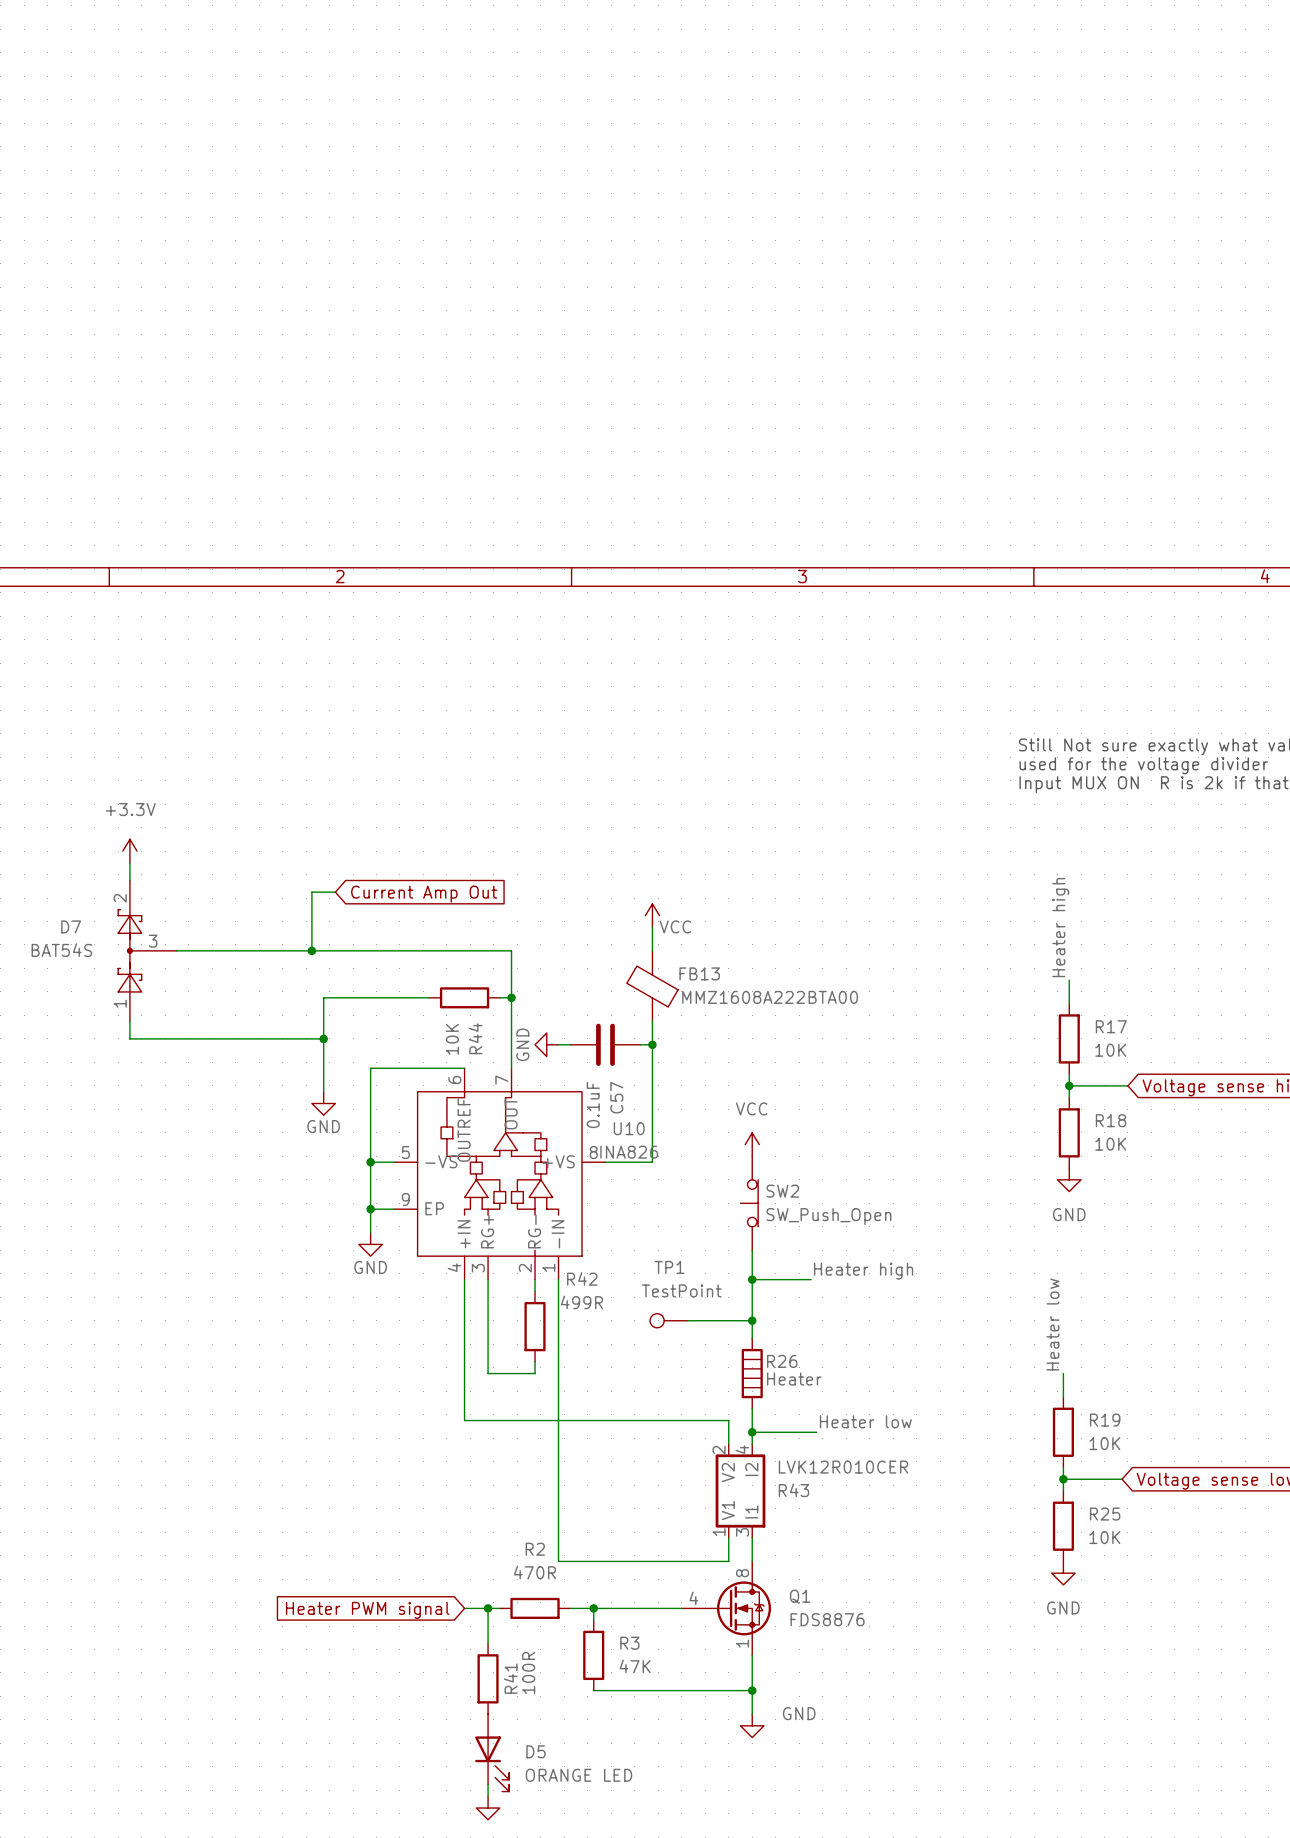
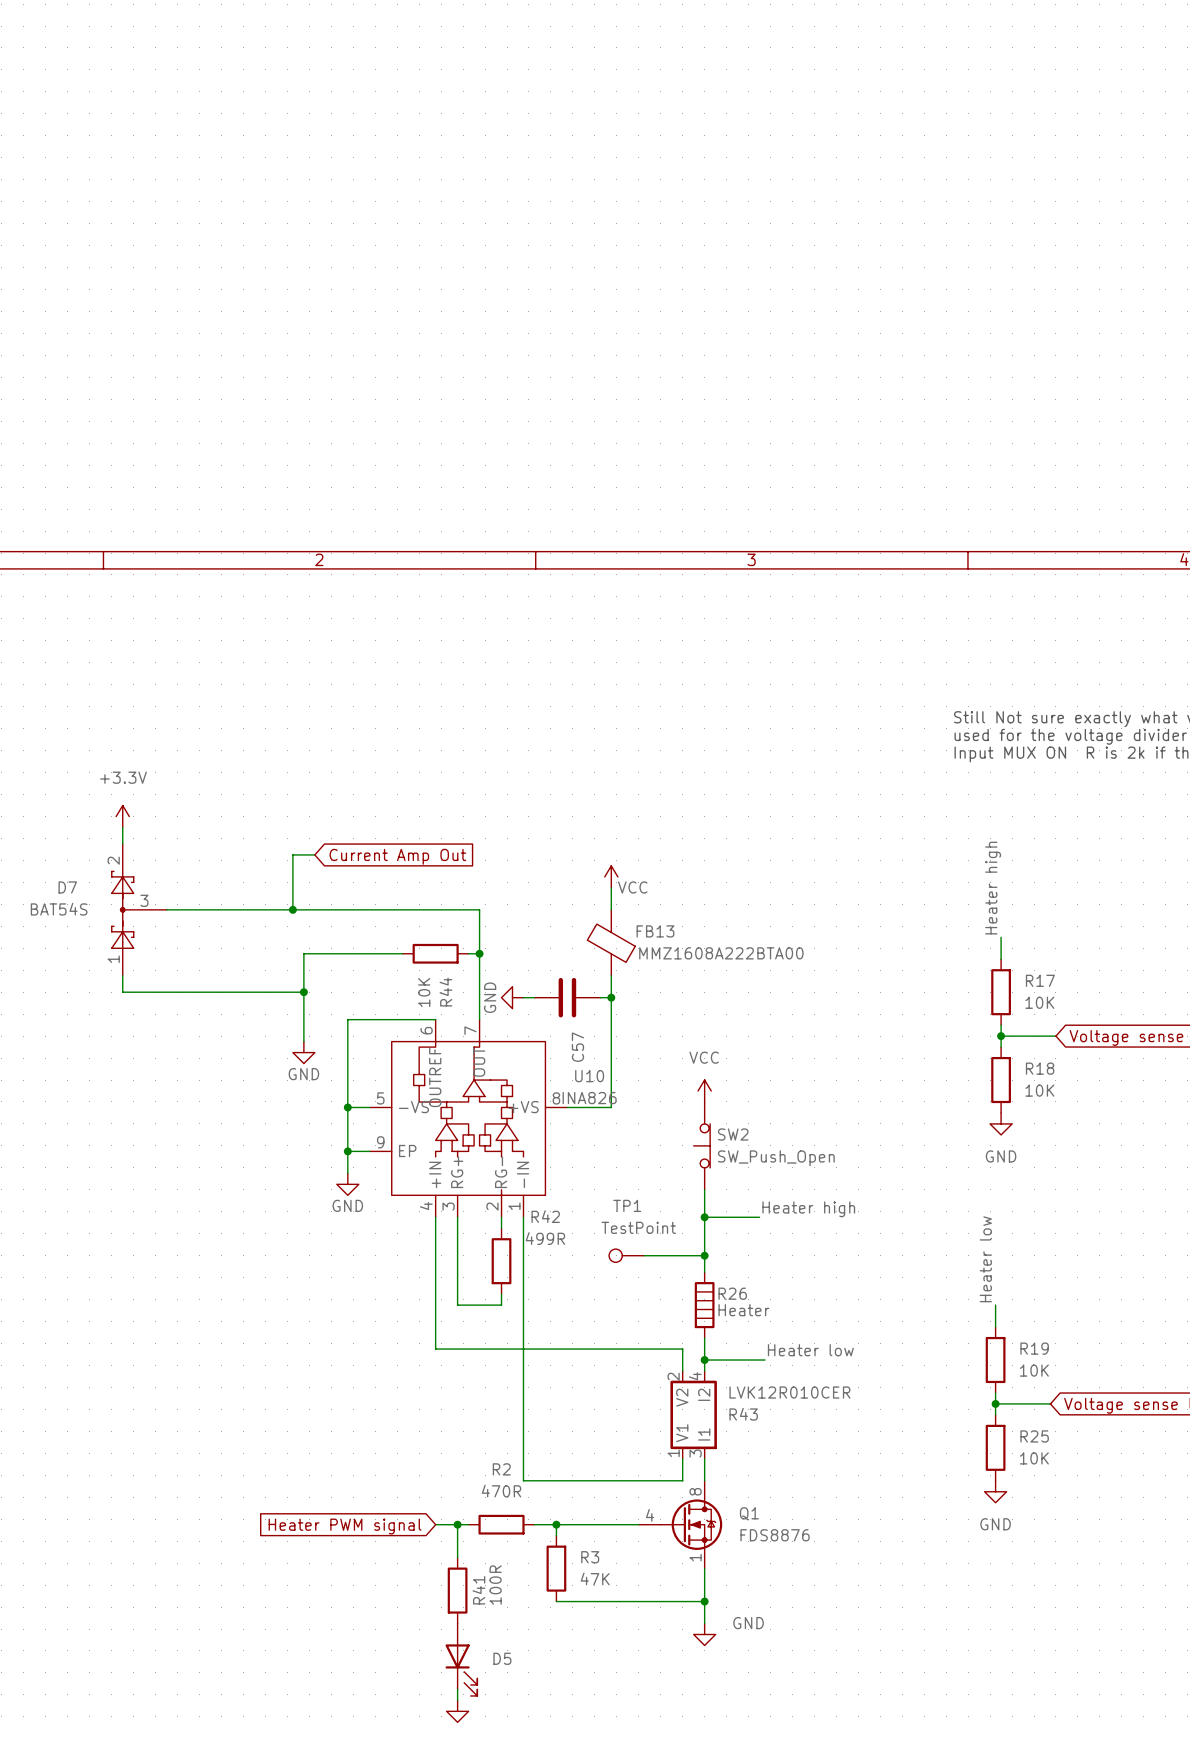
C57 value: 0.1uF (593, 1104) -> none
D5 value: ORANGE LED (578, 1775) -> none

